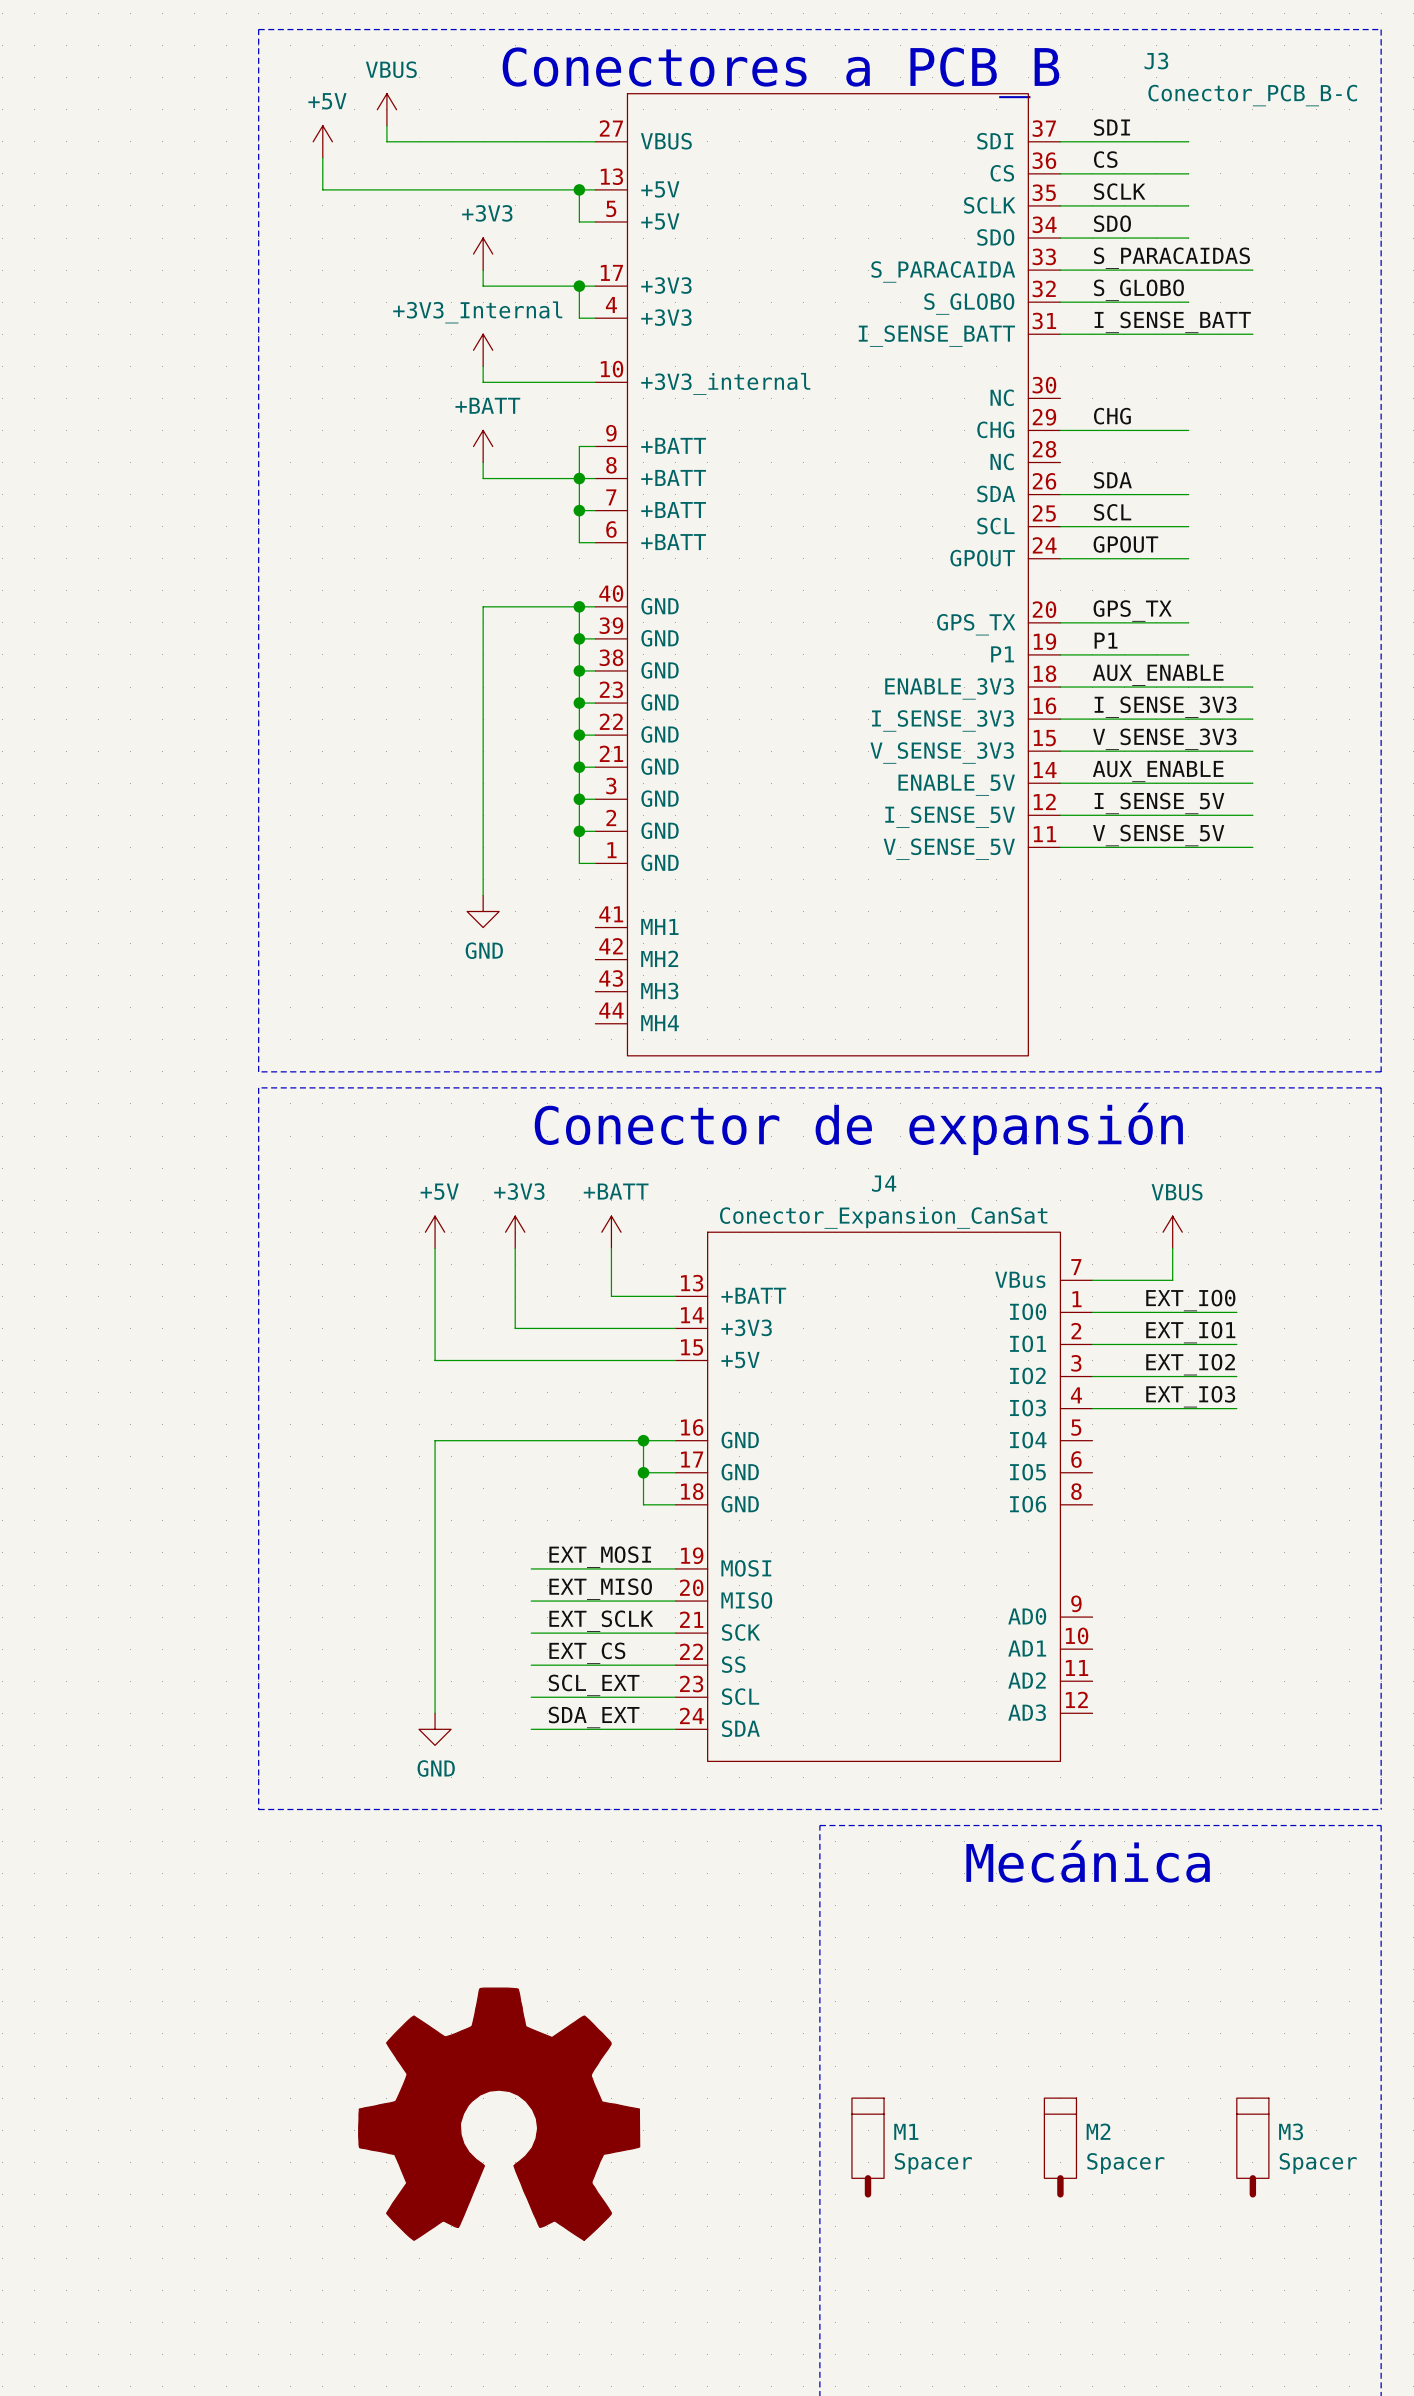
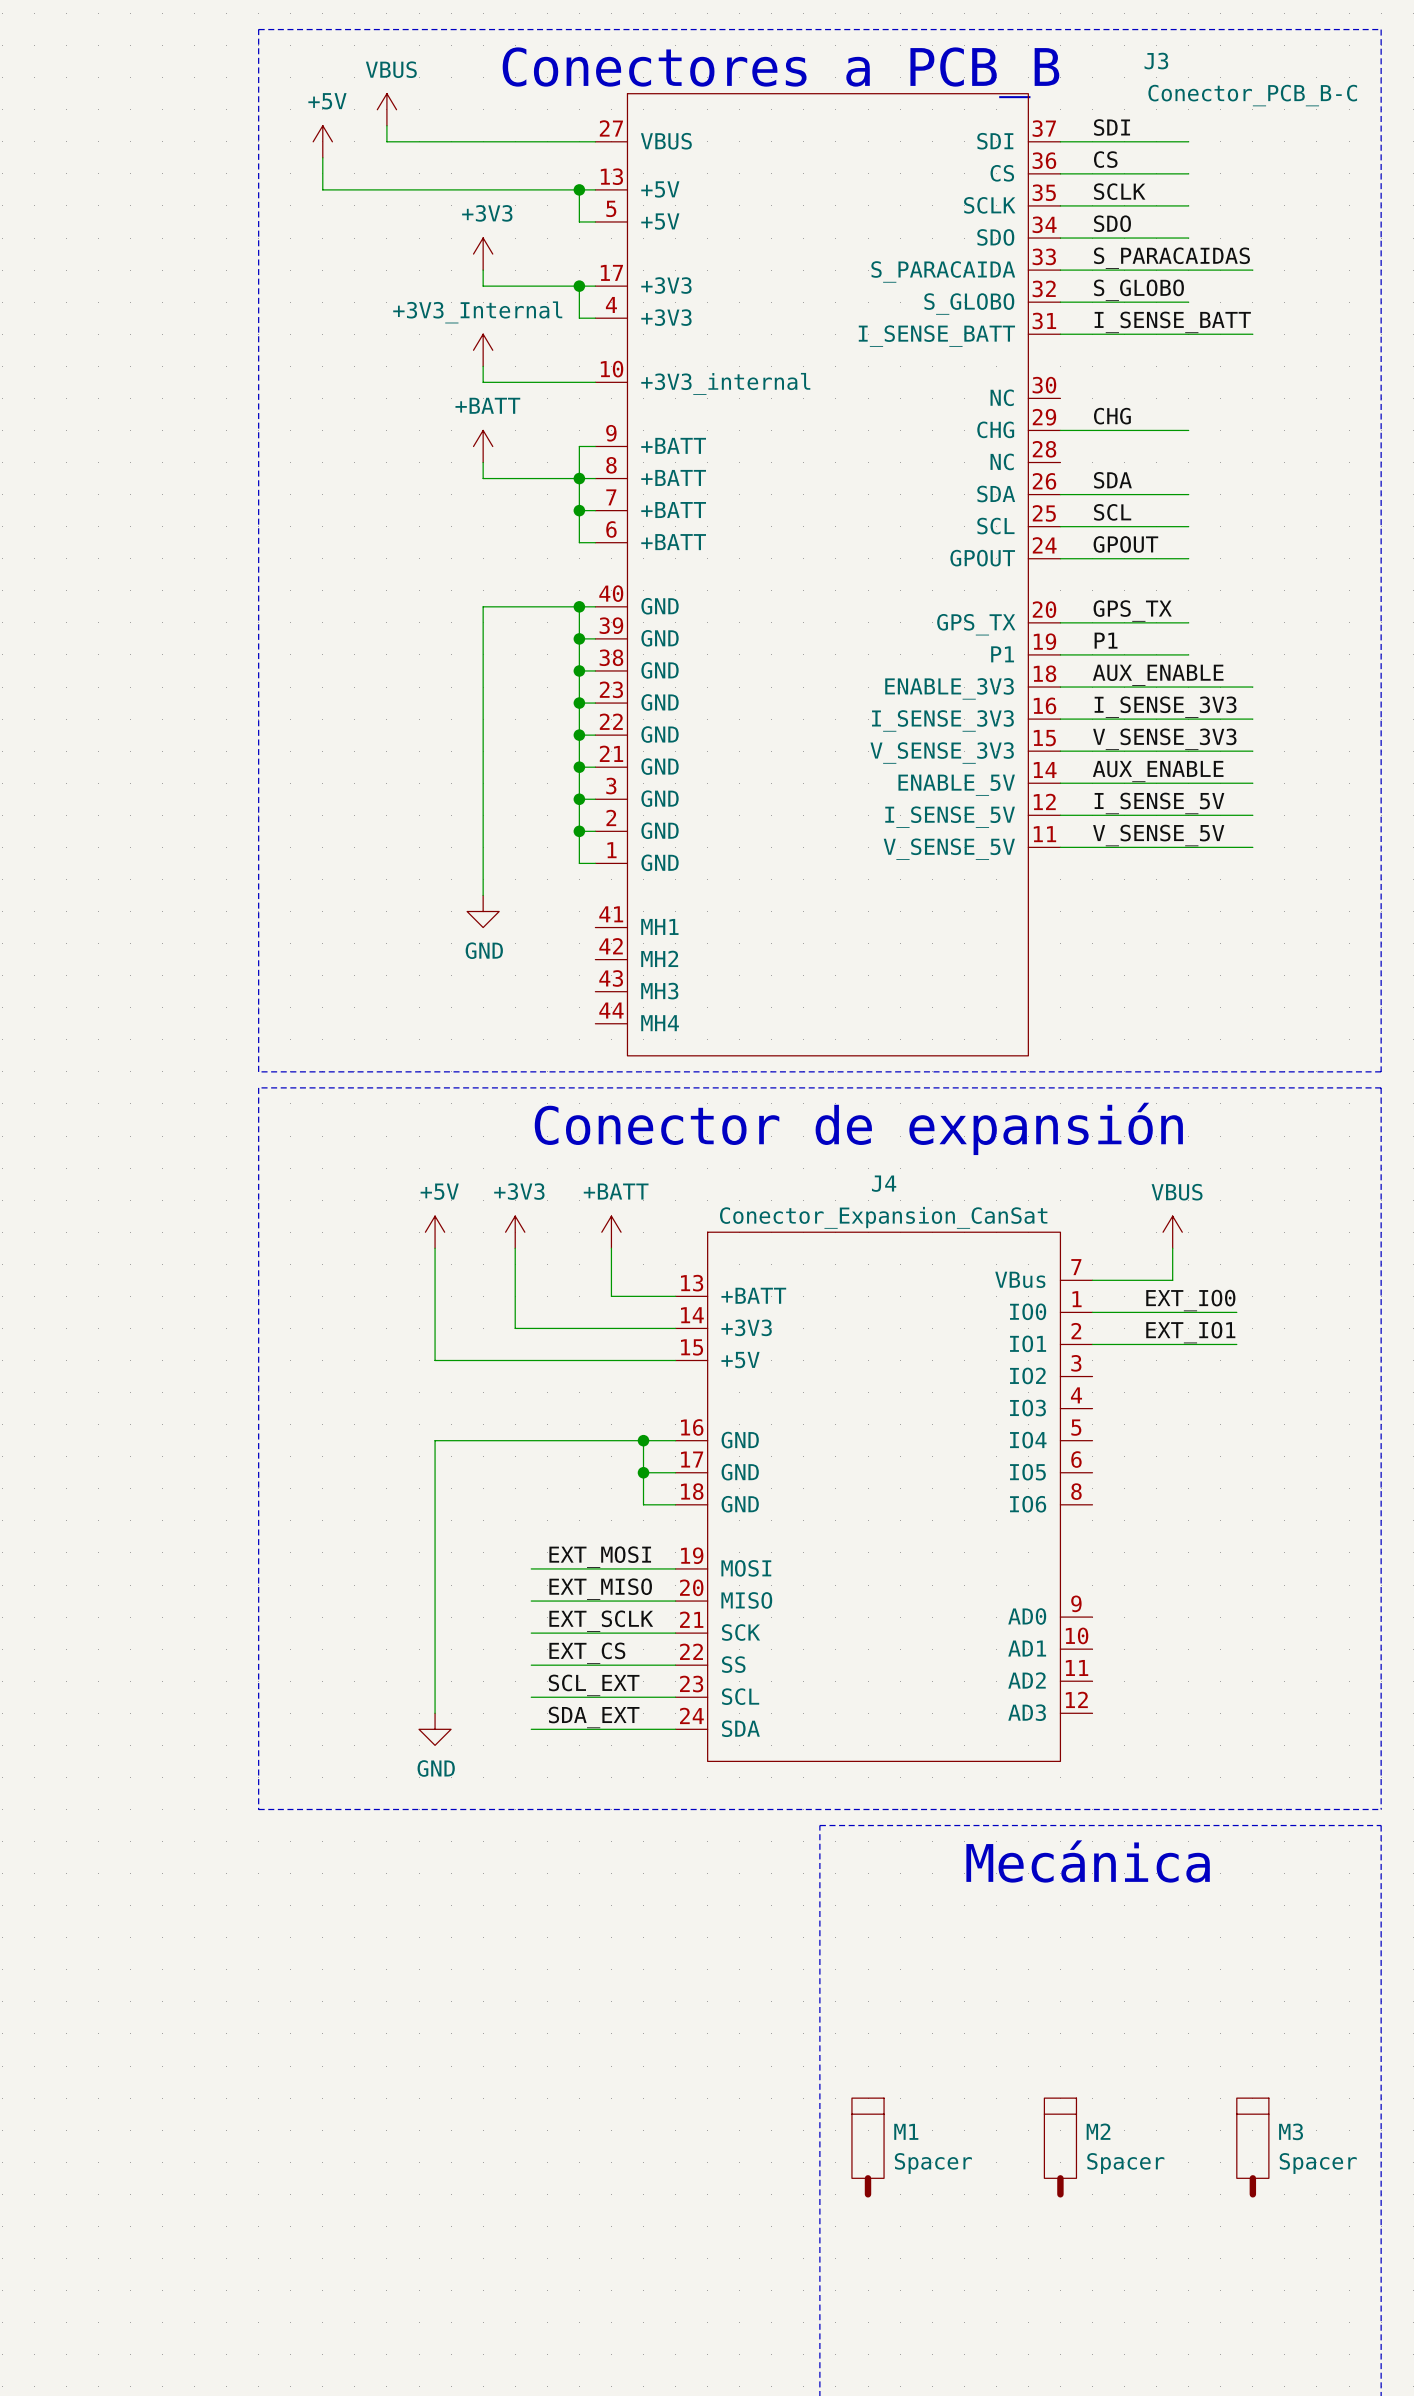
label: EXT_IO2 (1190, 1364) -> none
wire: (1092, 1376) (1236, 1376) -> none
label: EXT_IO3 (1190, 1396) -> none
wire: (1092, 1408) (1236, 1408) -> none
power symbol: (499, 2114) -> none

